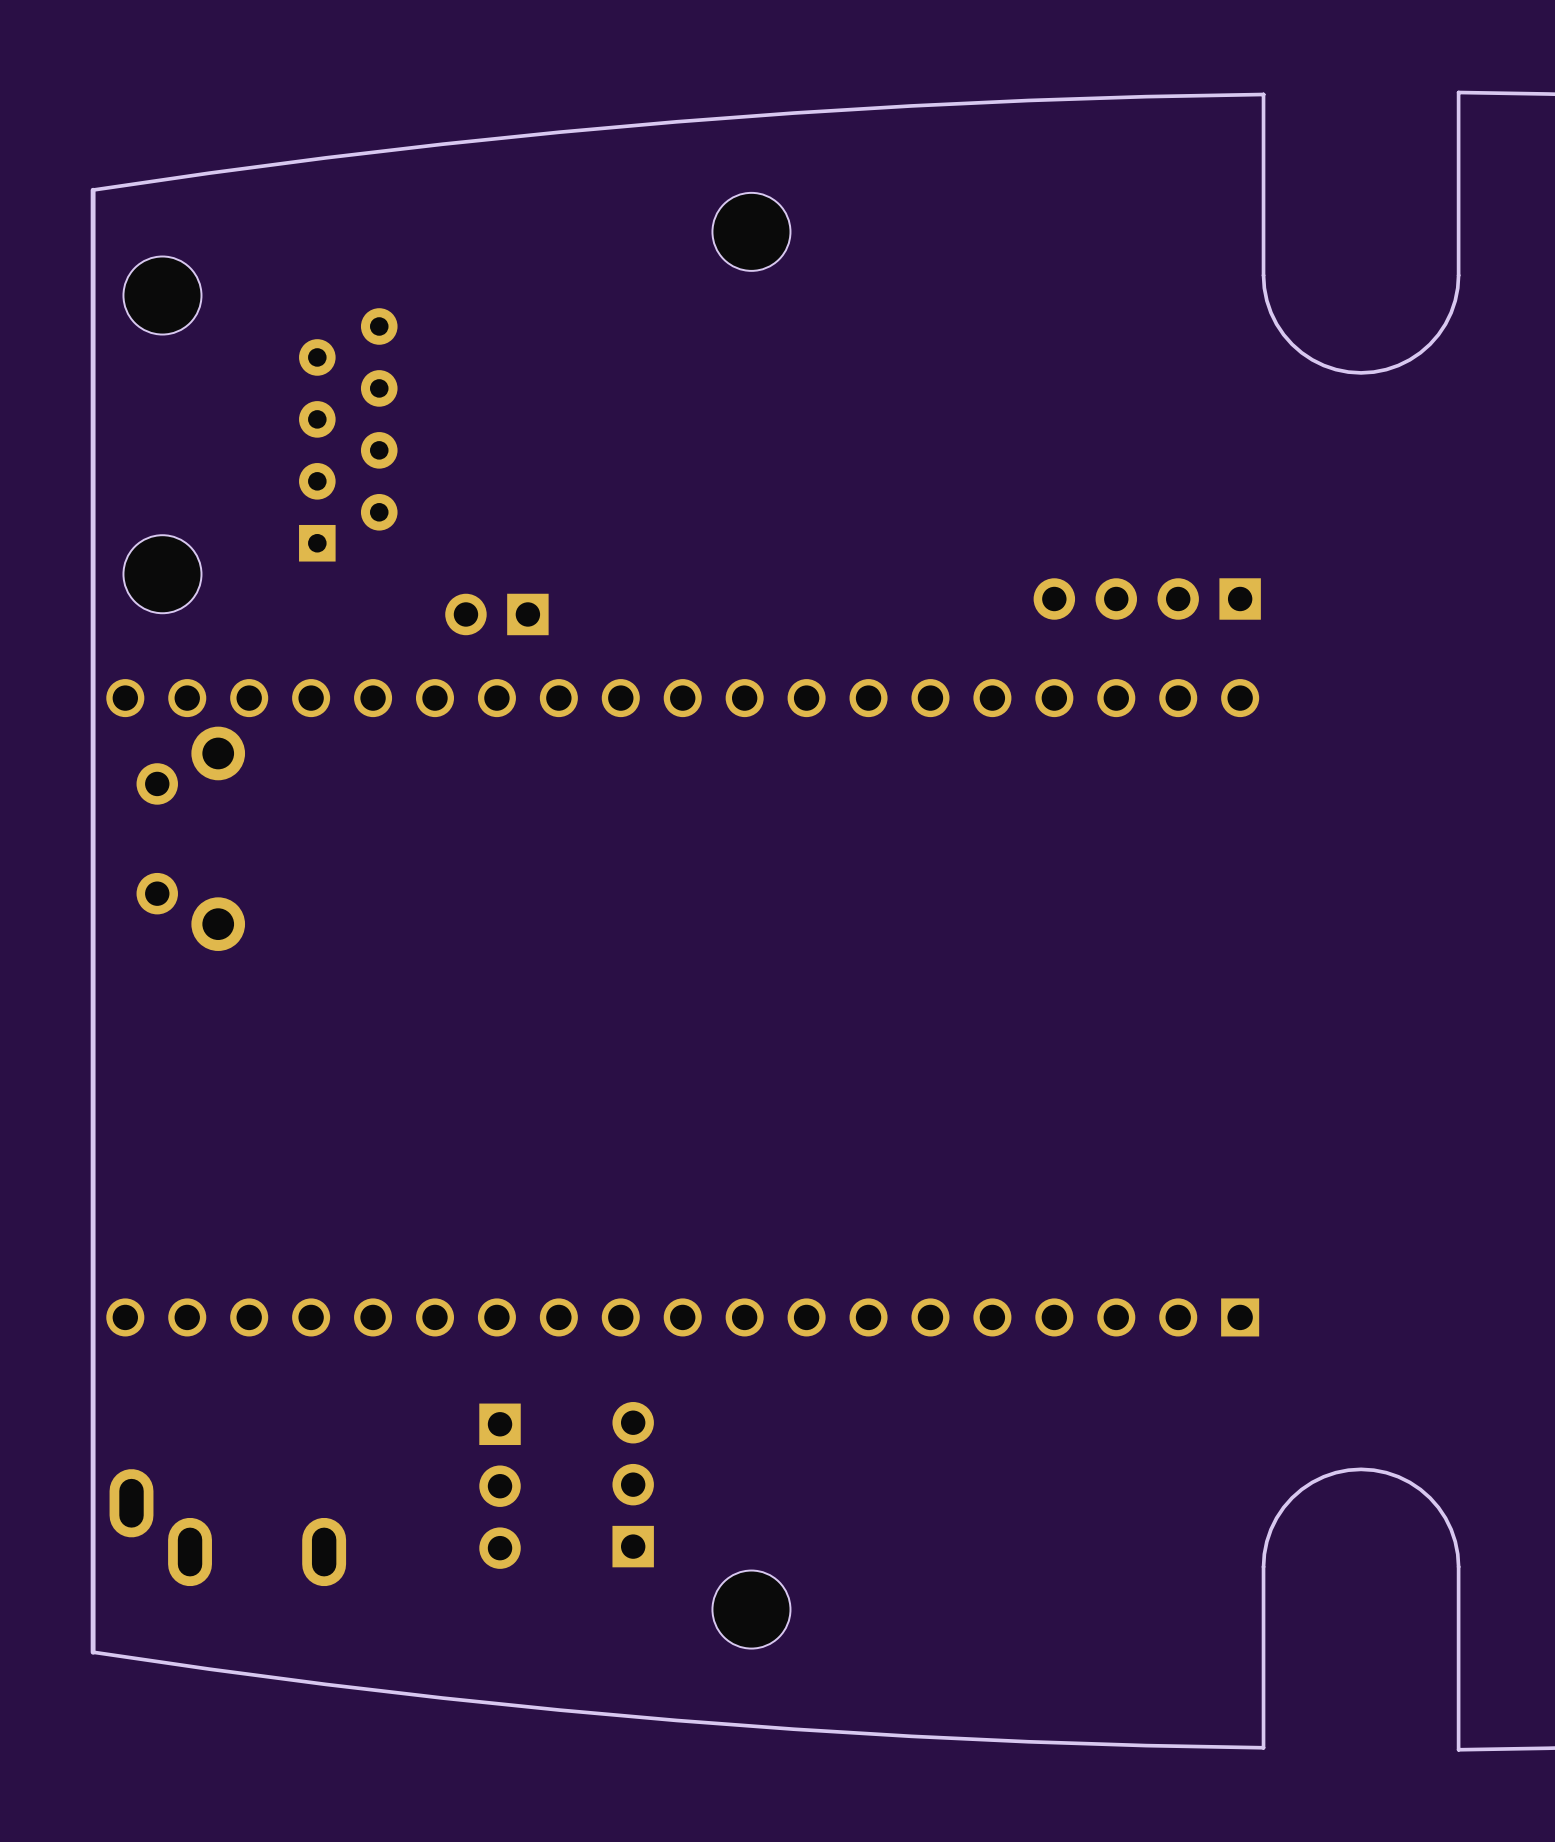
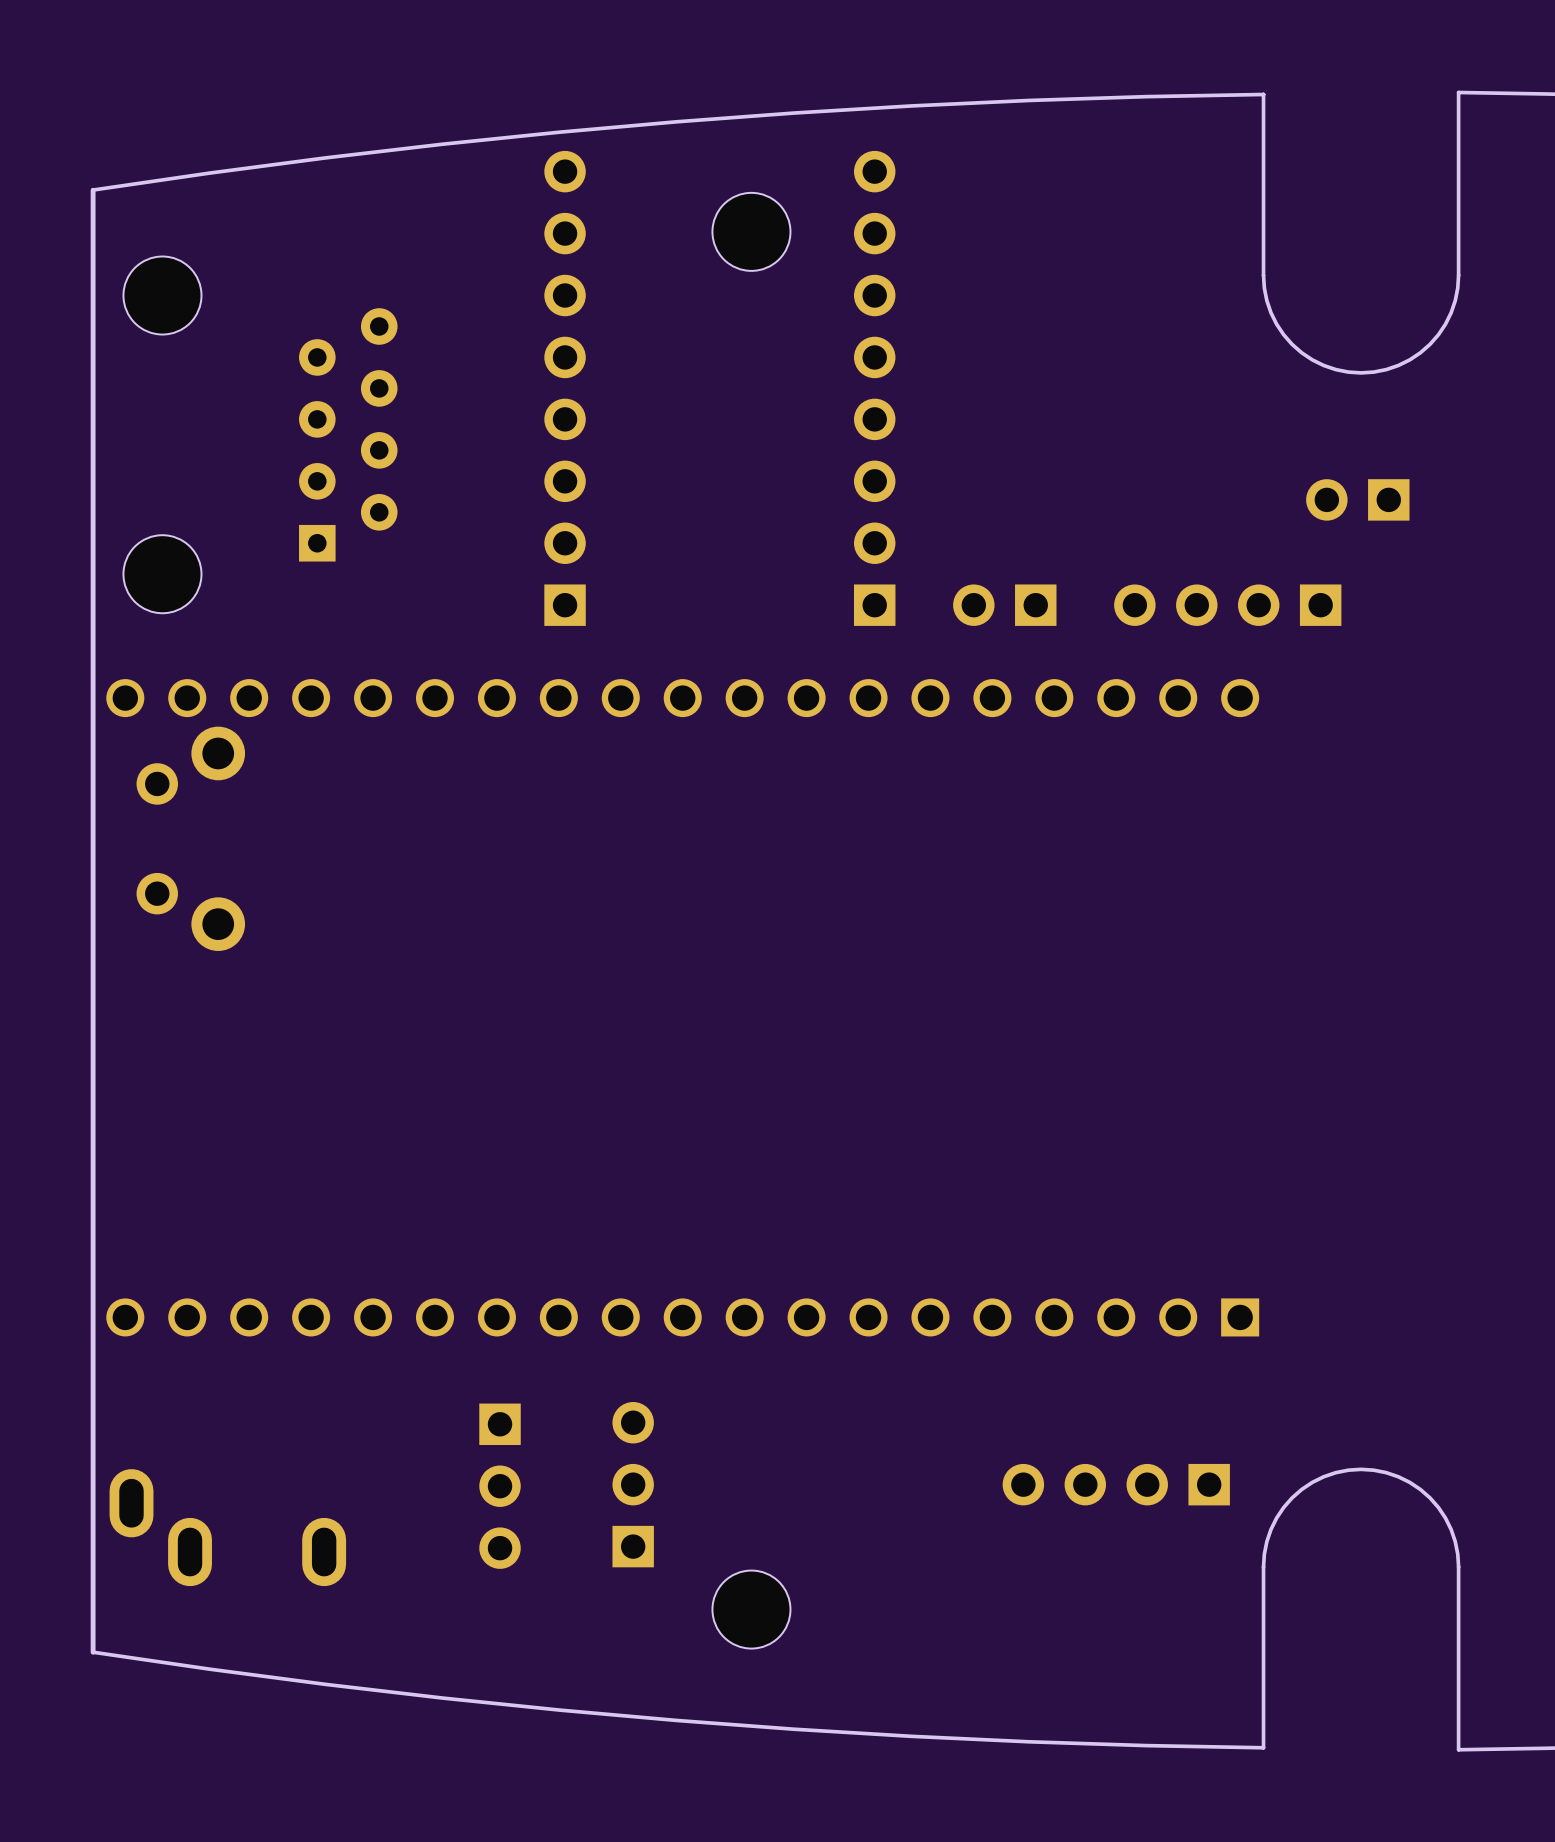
part: none -> (565, 388)
part: none -> (874, 388)
part: none -> (1357, 499)
part position: (1147, 598) -> (1227, 605)
part: none -> (1004, 605)
part: (496, 614) -> none
part: none -> (1116, 1484)

